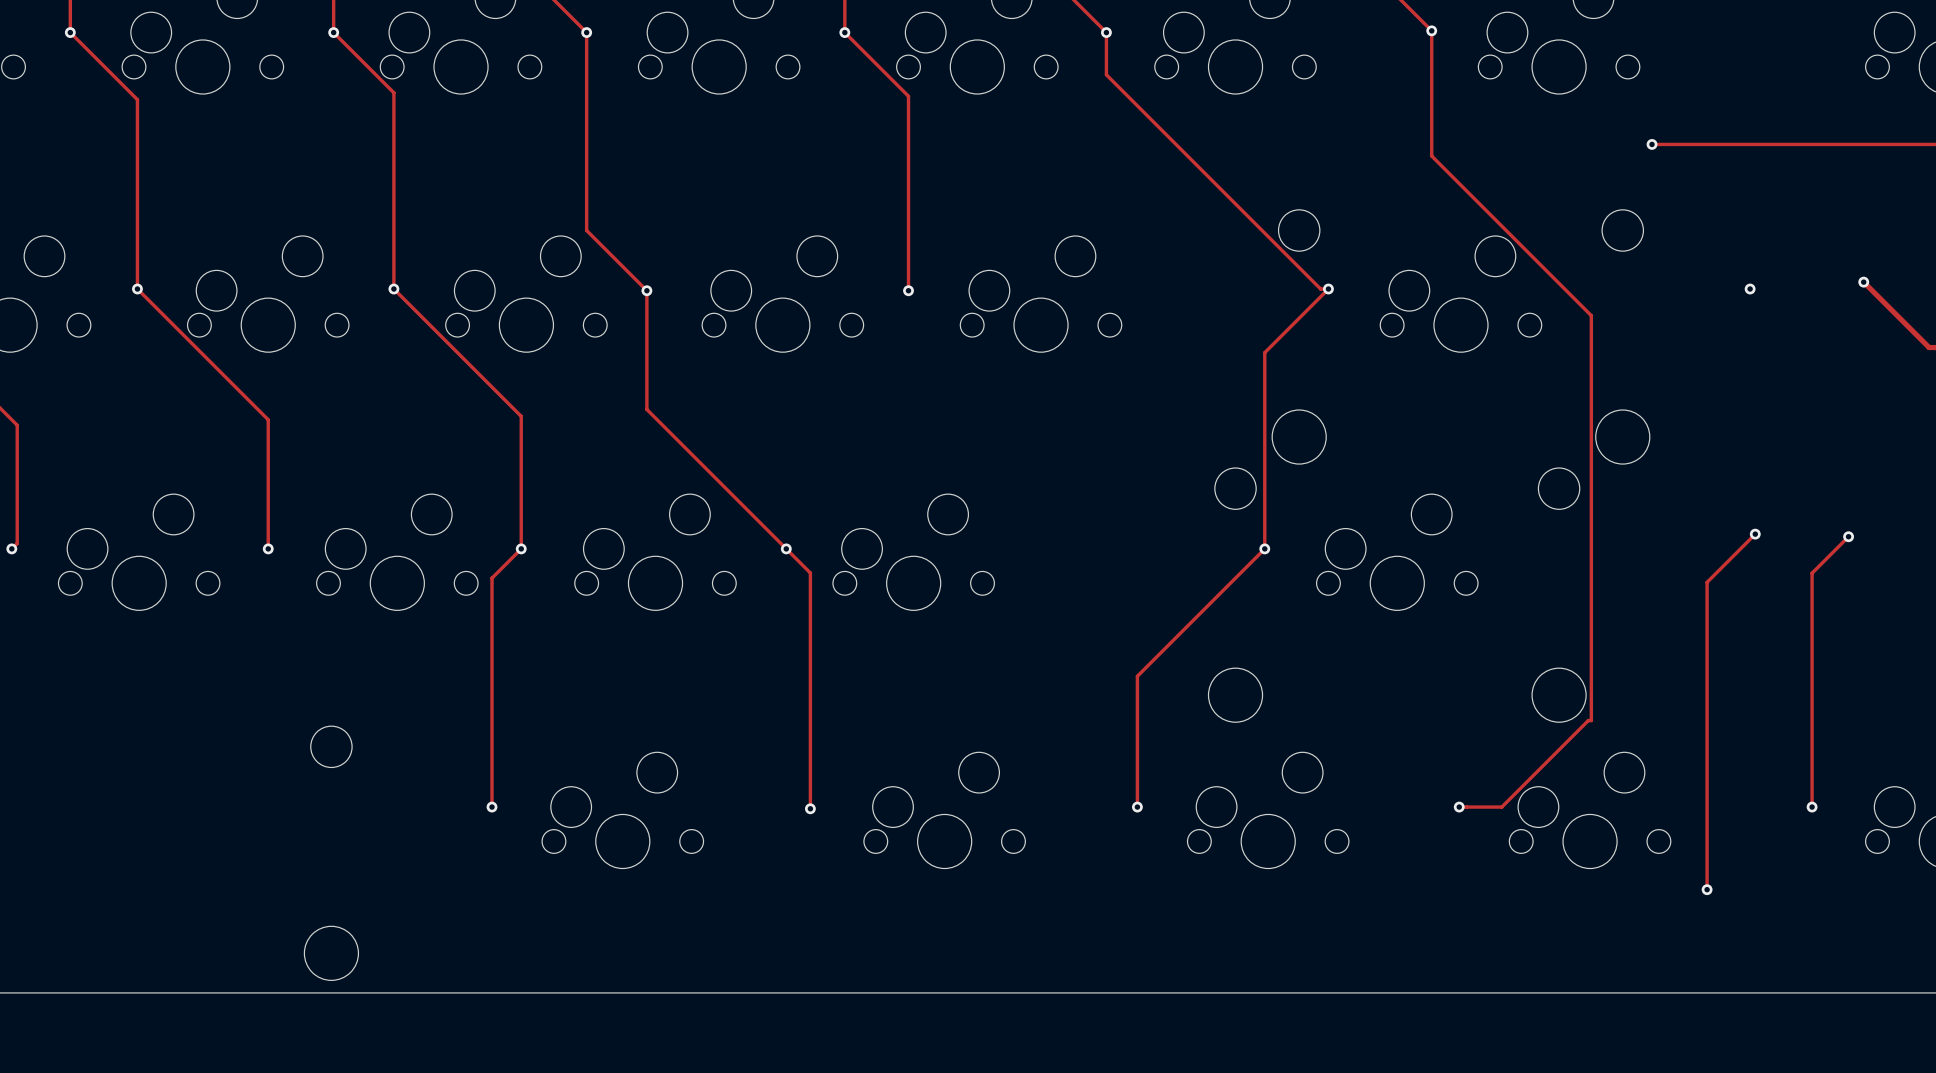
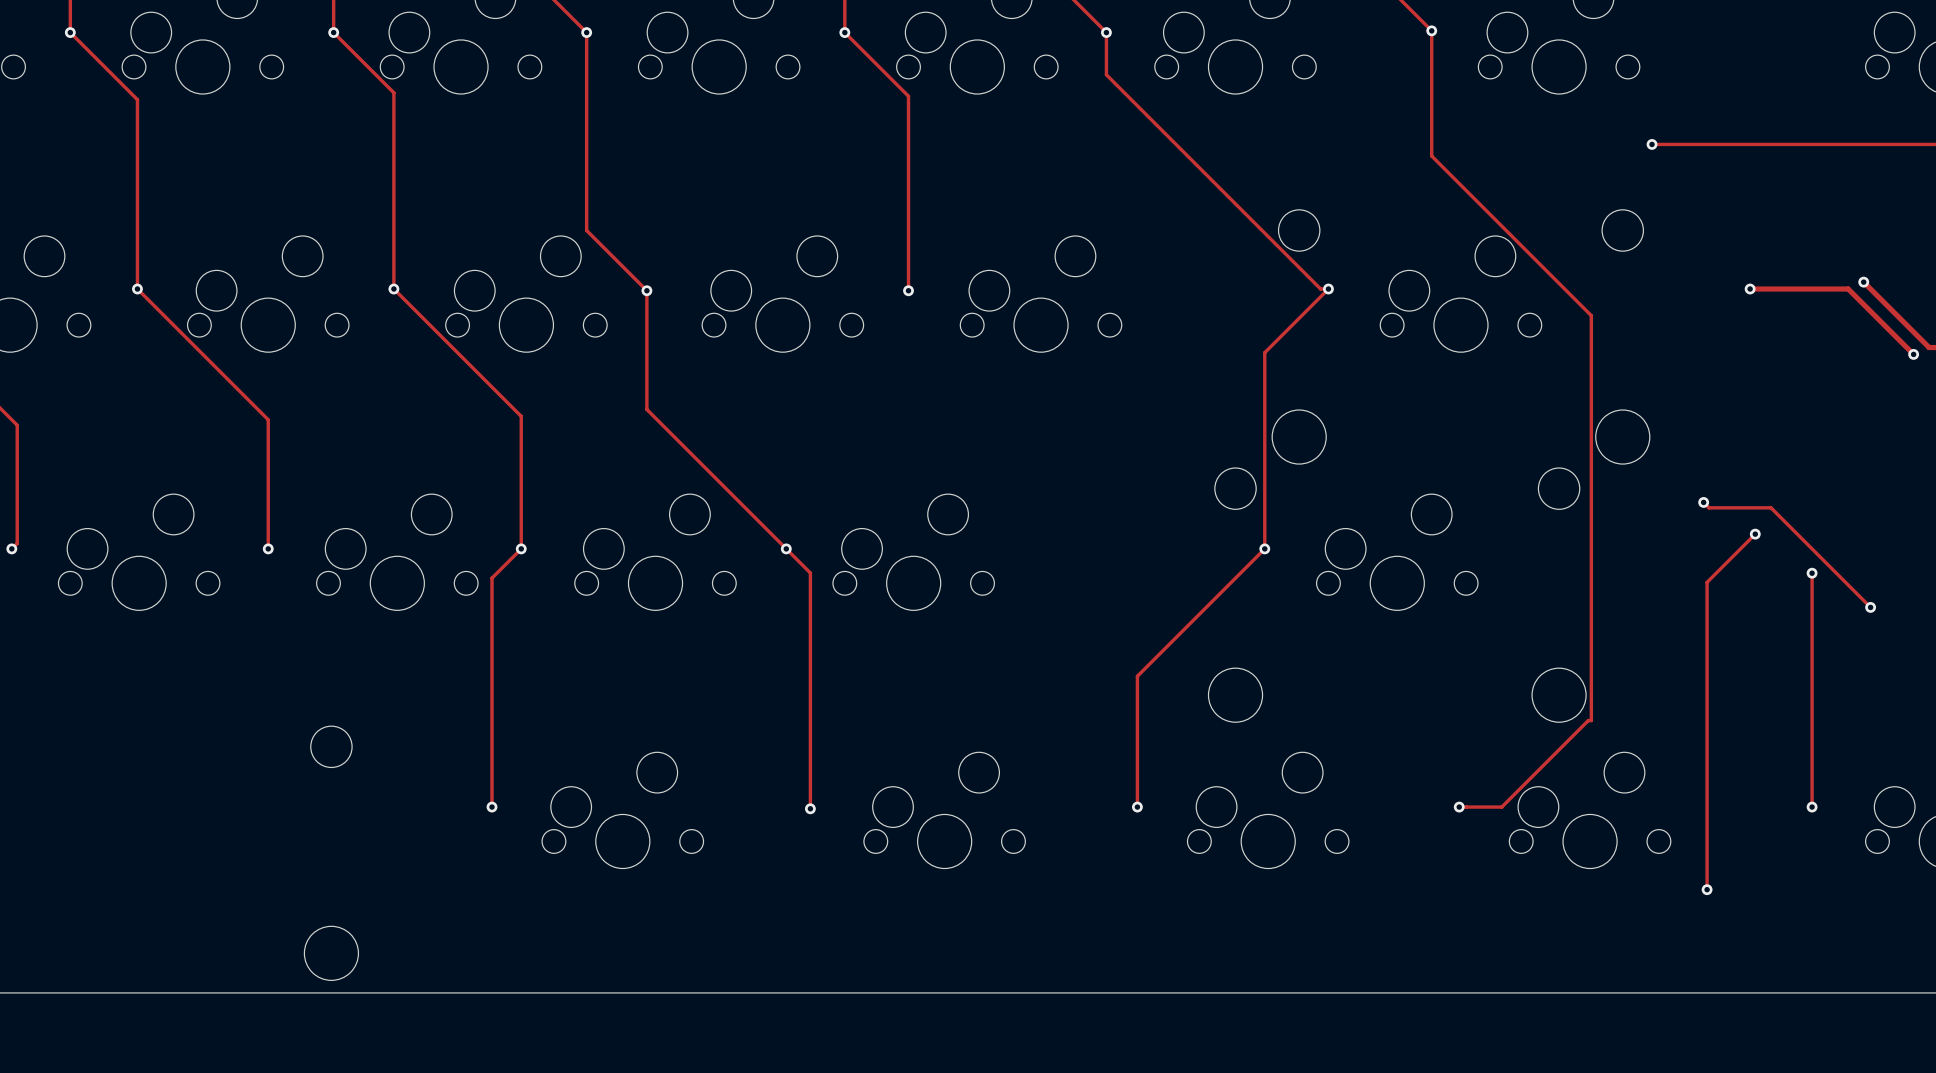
track: none -> (1750, 289) (1848, 289) (1913, 354)
via: none -> (1913, 354)
track: none -> (1703, 502) (1709, 507) (1771, 507) (1870, 607)
via: none -> (1703, 502)
track: (1848, 536) (1812, 573) -> none
via: (1848, 536) -> none
via: none -> (1812, 573)
via: none -> (1870, 607)

